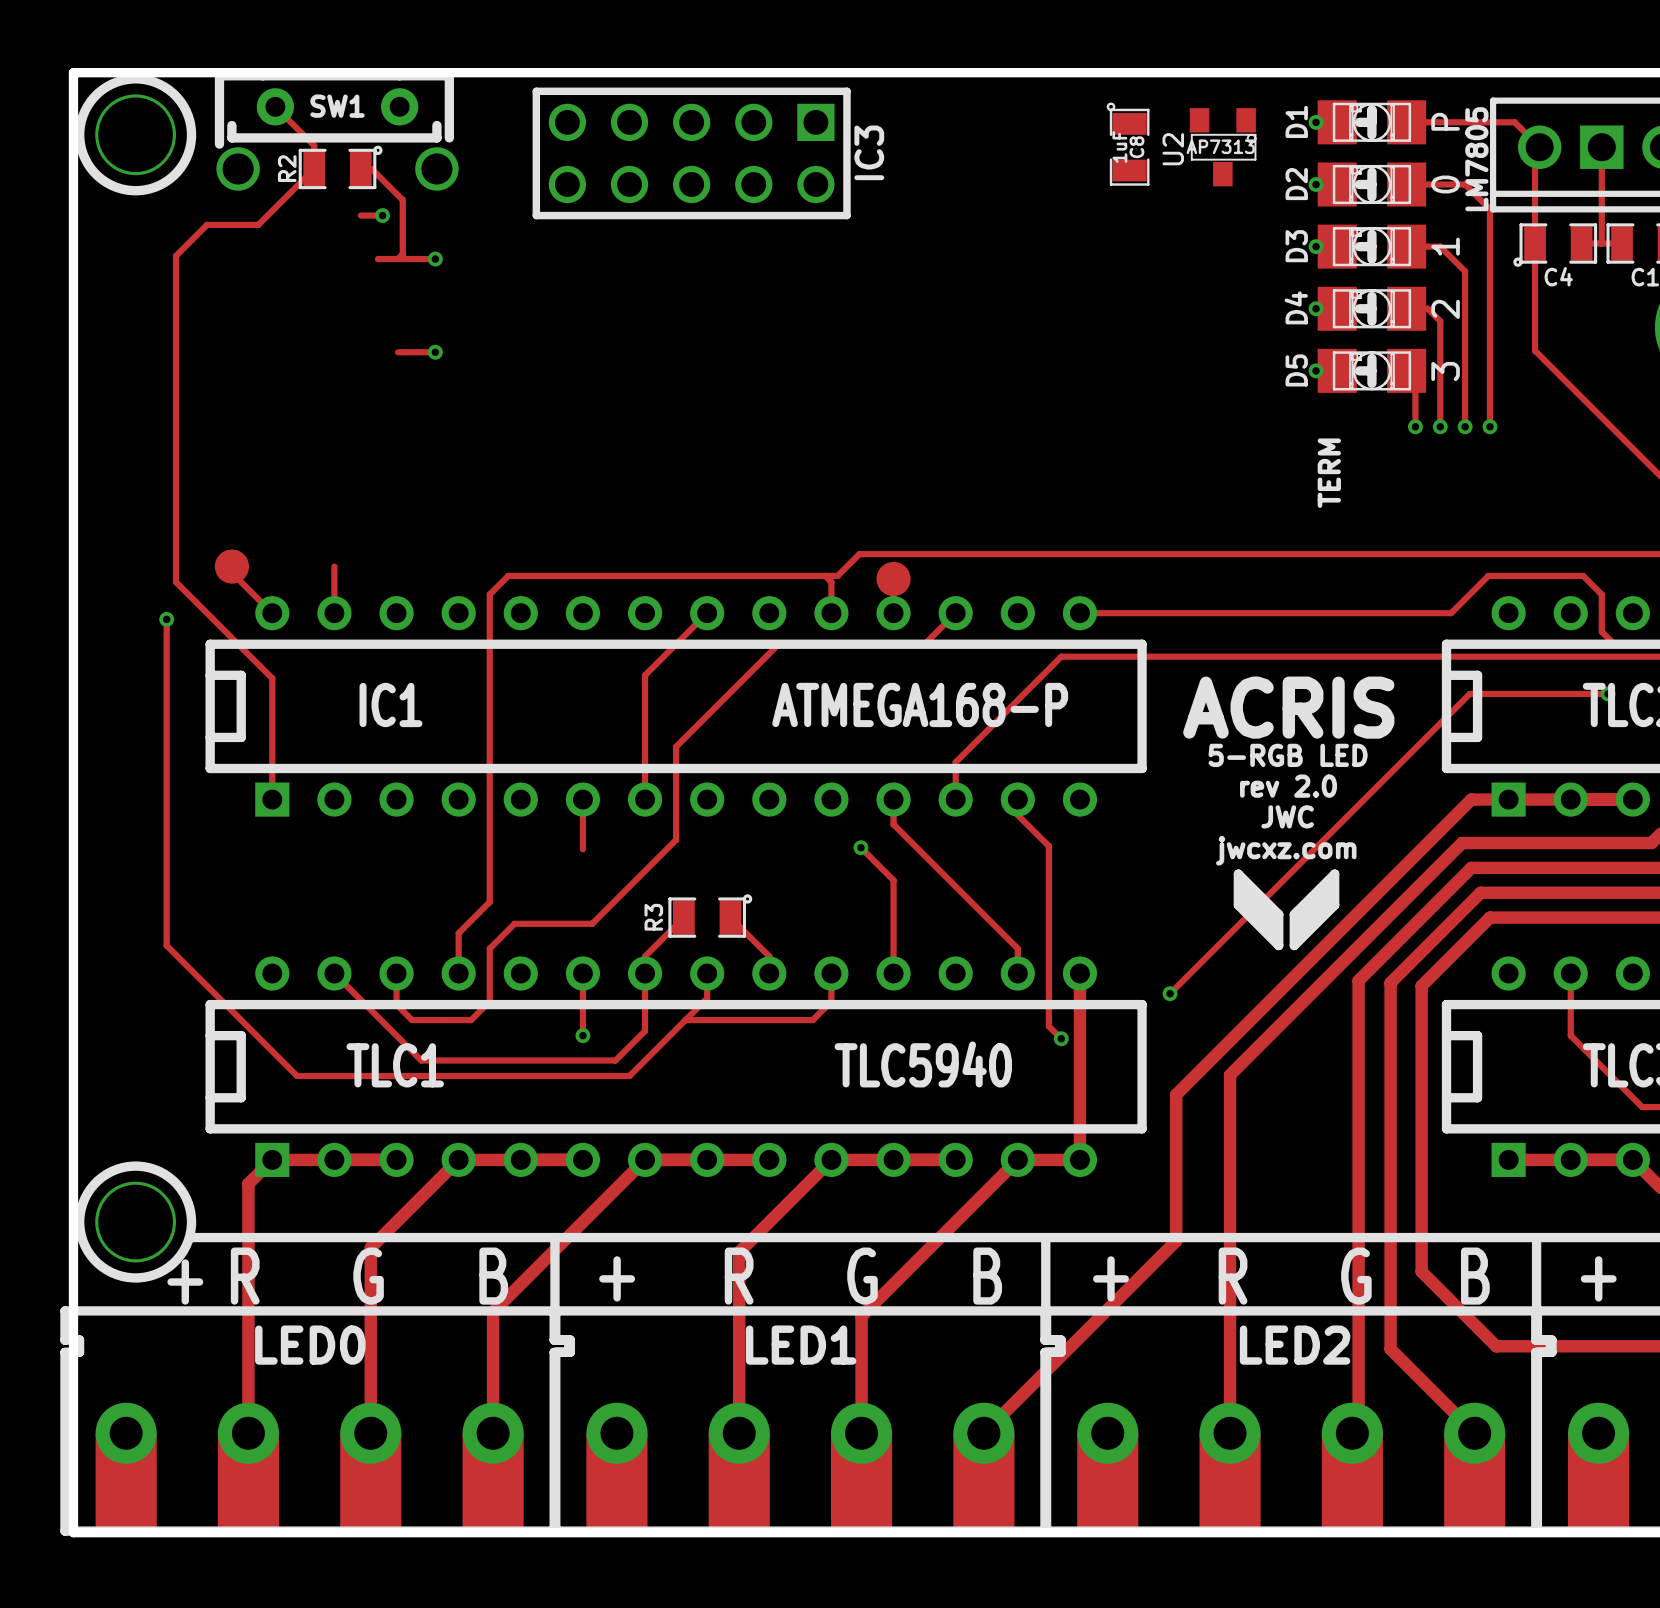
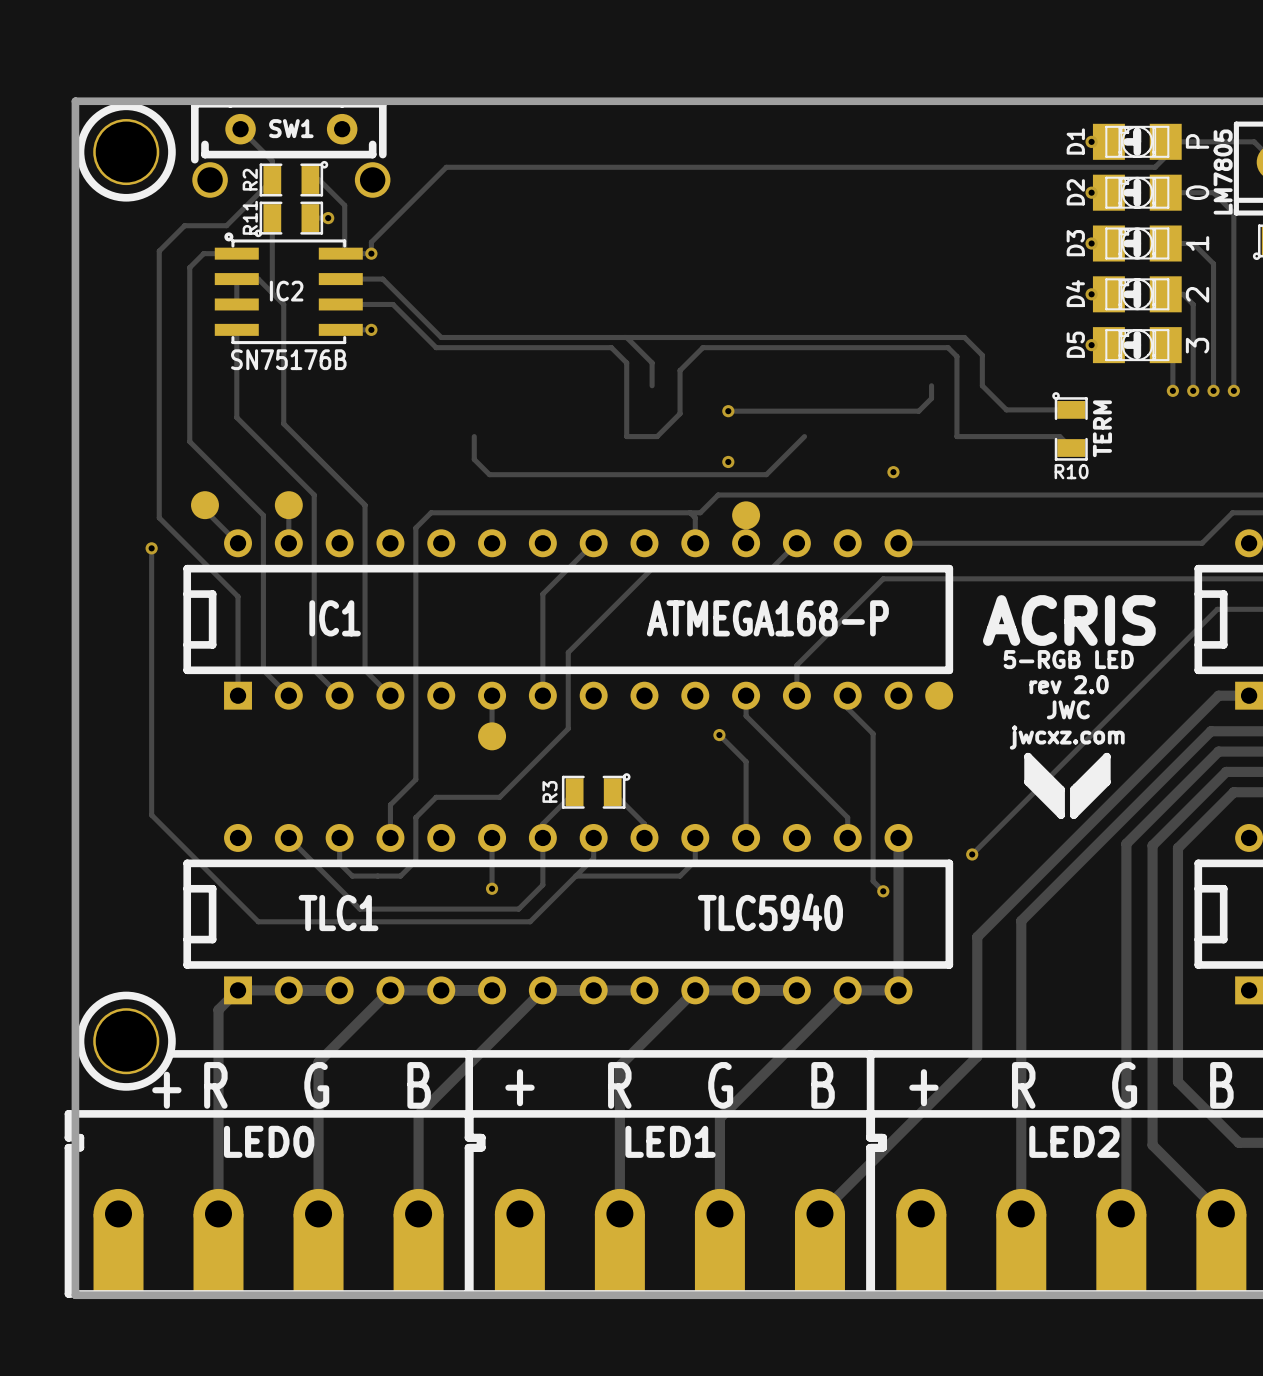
track: none -> (1165, 141) (1165, 156) (1155, 167) (446, 167) (371, 242) (371, 253)
C8: 1uF (1128, 144) -> none
U2: AP7313 (1223, 147) -> none
IC3: (691, 153) -> none
track: none -> (272, 218) (272, 293)
R11: none -> (288, 219)
track: none -> (236, 253) (203, 253) (189, 267) (189, 441) (263, 515) (263, 670) (288, 695)
track: none -> (340, 279) (382, 279) (441, 337) (964, 337) (982, 355) (982, 385) (1006, 409) (1071, 409)
IC2: none -> SN75176B (288, 288)
track: none -> (236, 304) (236, 279) (258, 279) (283, 304) (283, 423) (365, 505) (365, 670) (390, 695)
track: none -> (340, 304) (392, 304) (436, 347) (611, 347) (626, 362) (626, 436) (657, 436) (680, 413) (680, 370) (702, 347) (948, 347) (956, 356) (956, 436) (1059, 436) (1071, 448)
track: none -> (236, 329) (236, 417) (314, 495) (314, 670) (339, 695)
track: none -> (626, 337) (652, 362) (652, 385)
track: none -> (931, 385) (931, 398) (918, 411) (728, 411)
via: none -> (728, 411)
R10: none -> (1070, 426)
track: none -> (474, 436) (474, 459) (489, 474) (766, 474) (804, 436)
via: none -> (728, 461)
via: none -> (893, 472)
part: none -> (288, 505)
part: none -> (939, 695)
part: none -> (492, 736)

